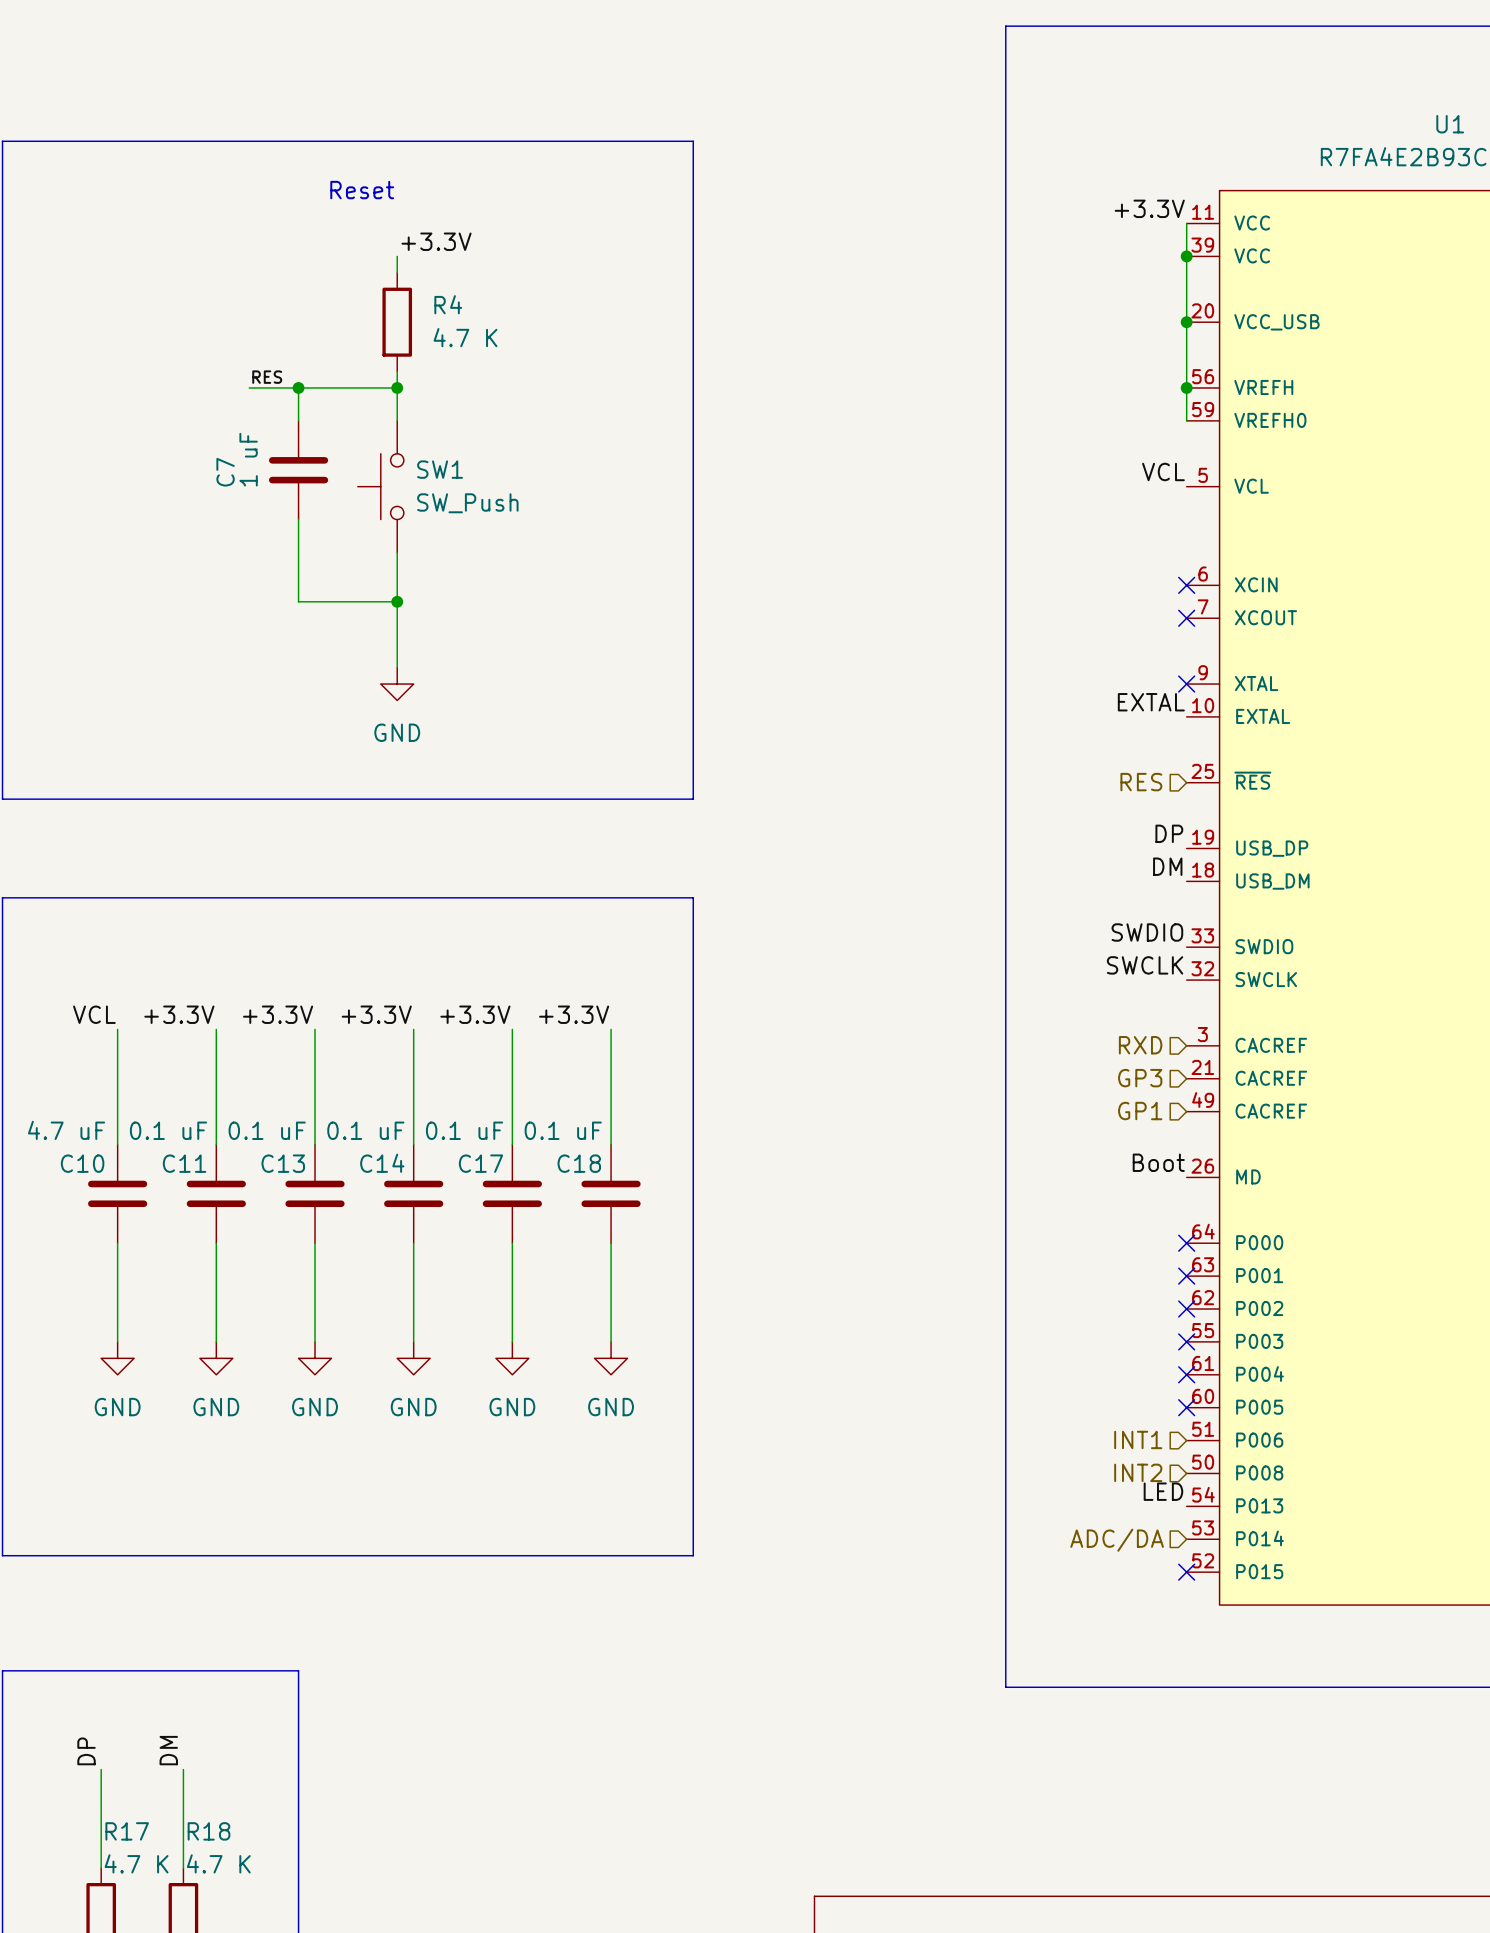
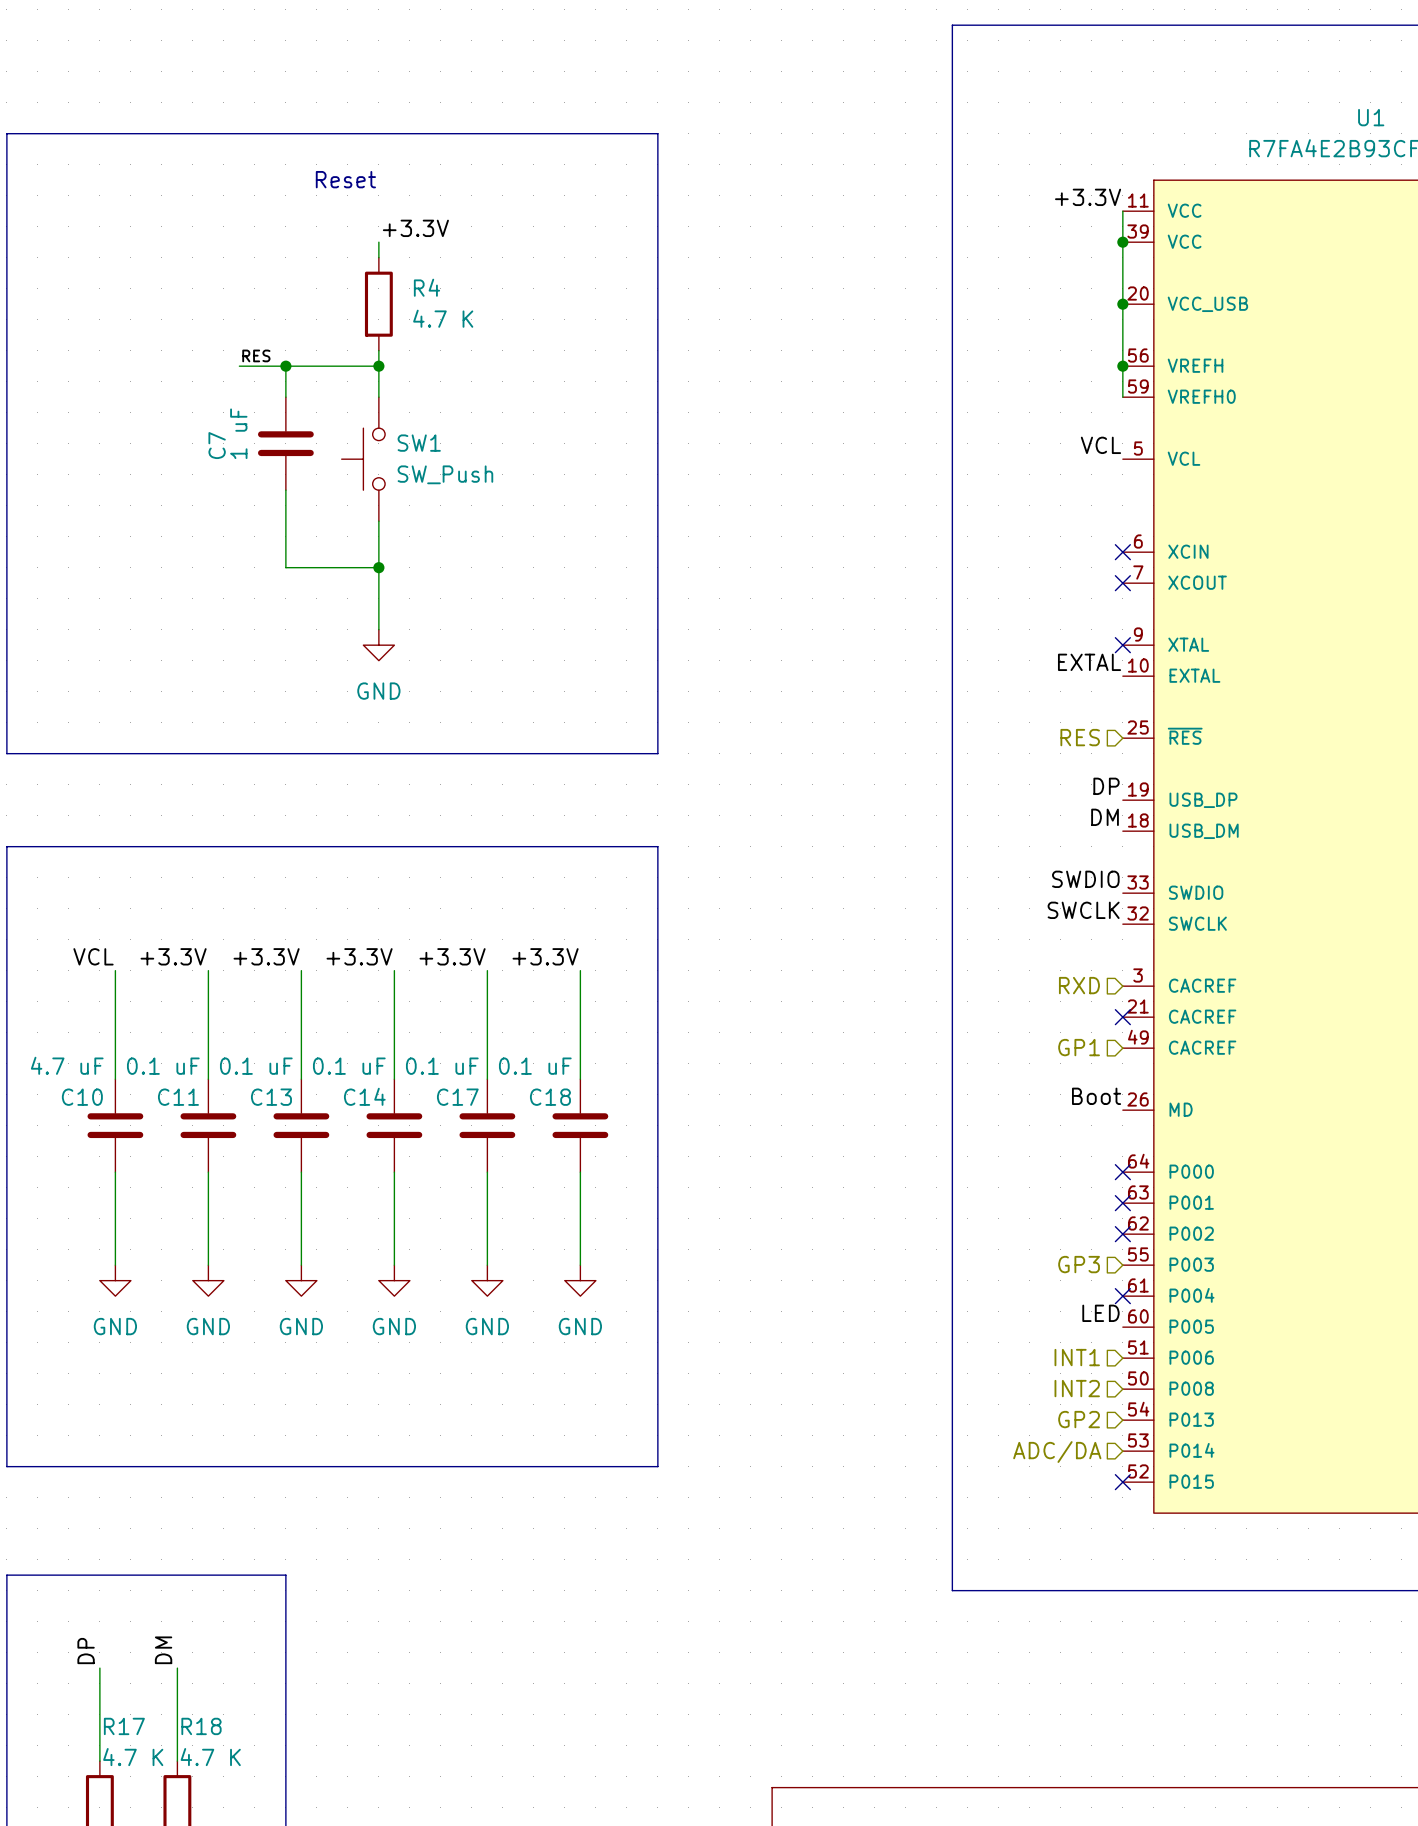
hierarchical label position: GP3 (1140, 1078) -> GP3 (1079, 1264)
no-connect mark: none -> (1122, 1017)
no-connect mark: (1186, 1341) -> none
no-connect mark: (1186, 1407) -> none
label position: LED (1163, 1491) -> LED (1100, 1313)
hierarchical label: none -> GP2 (1079, 1419)

